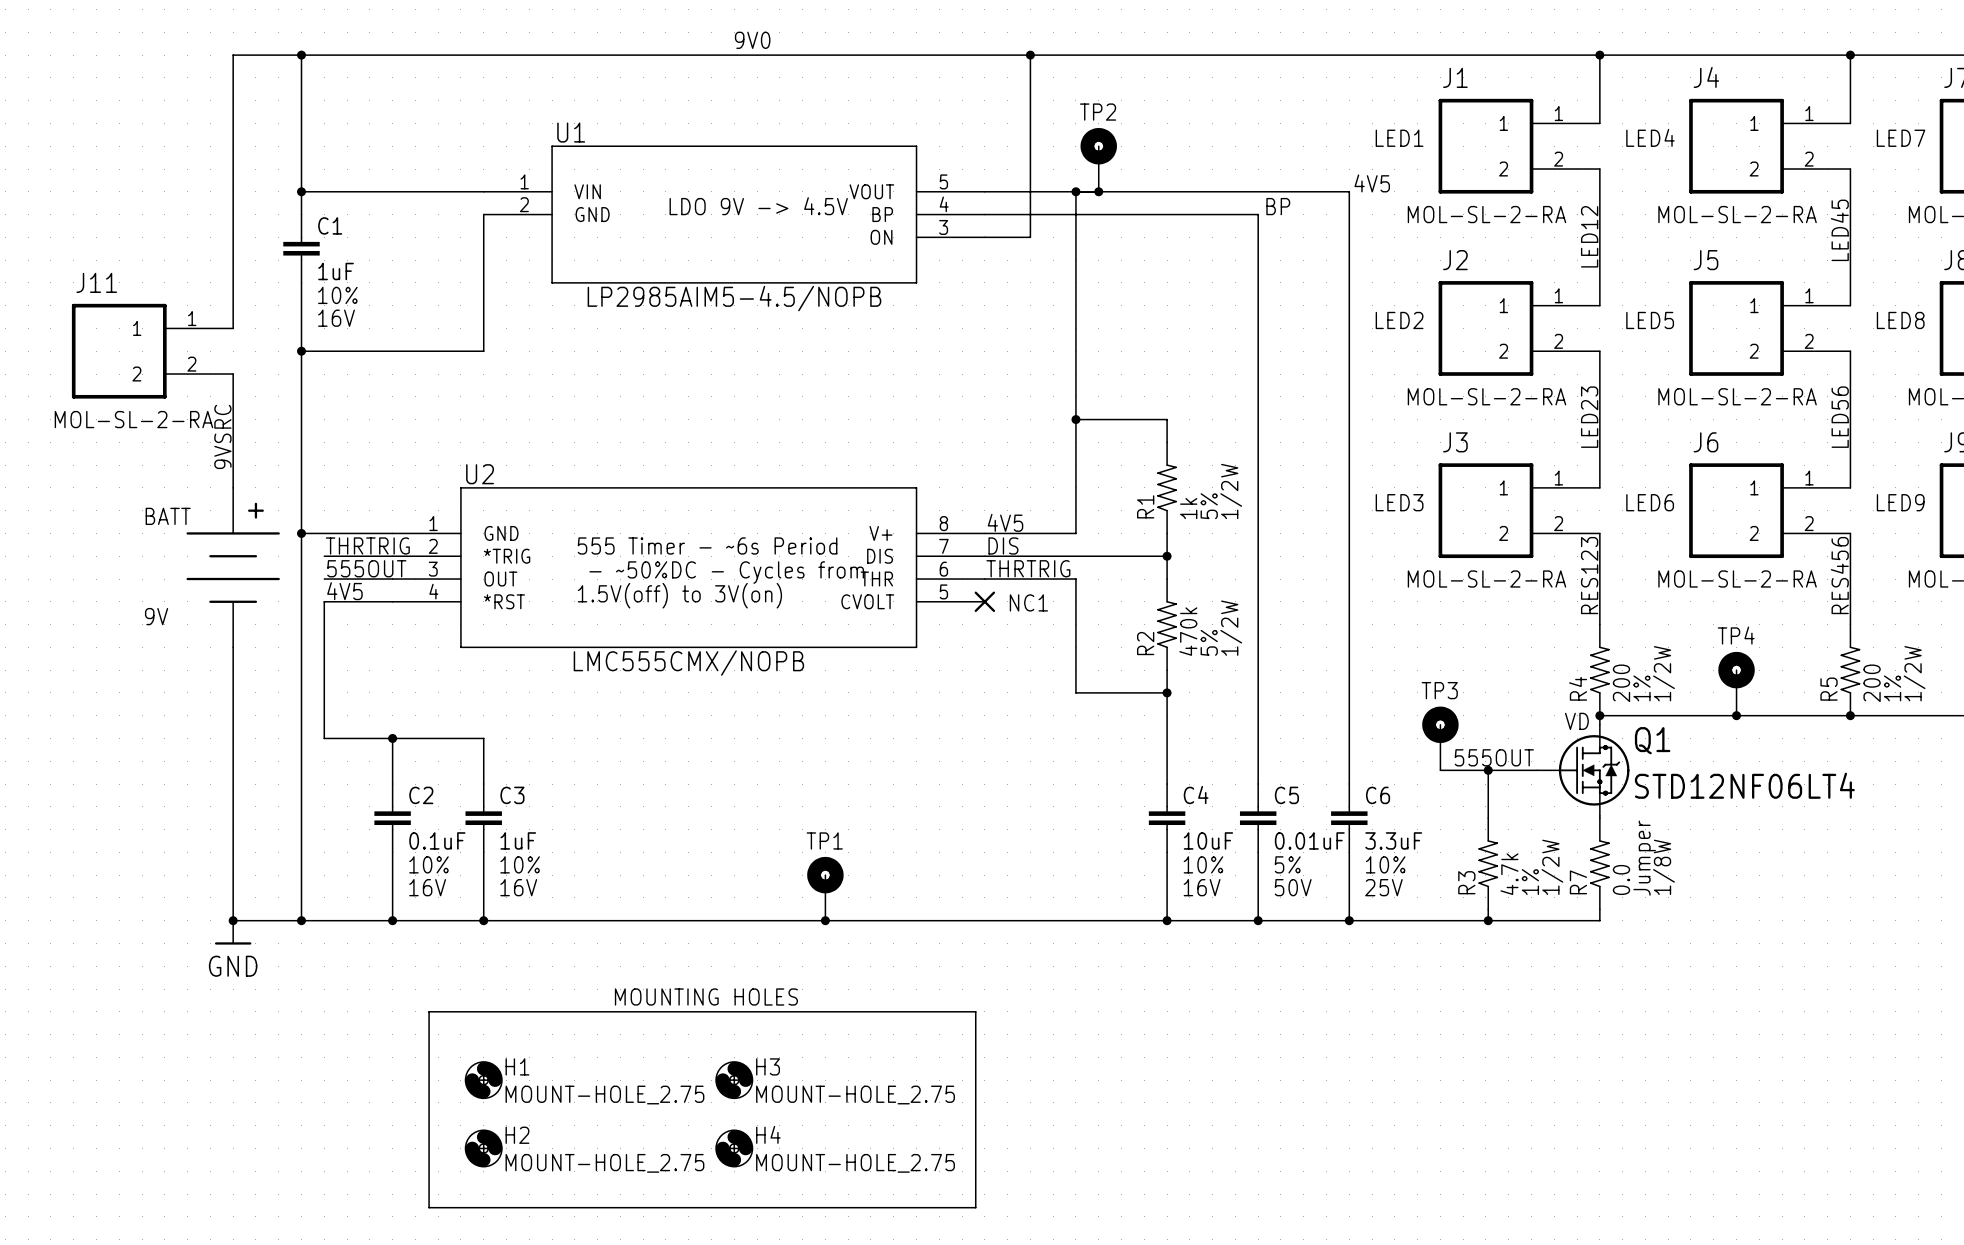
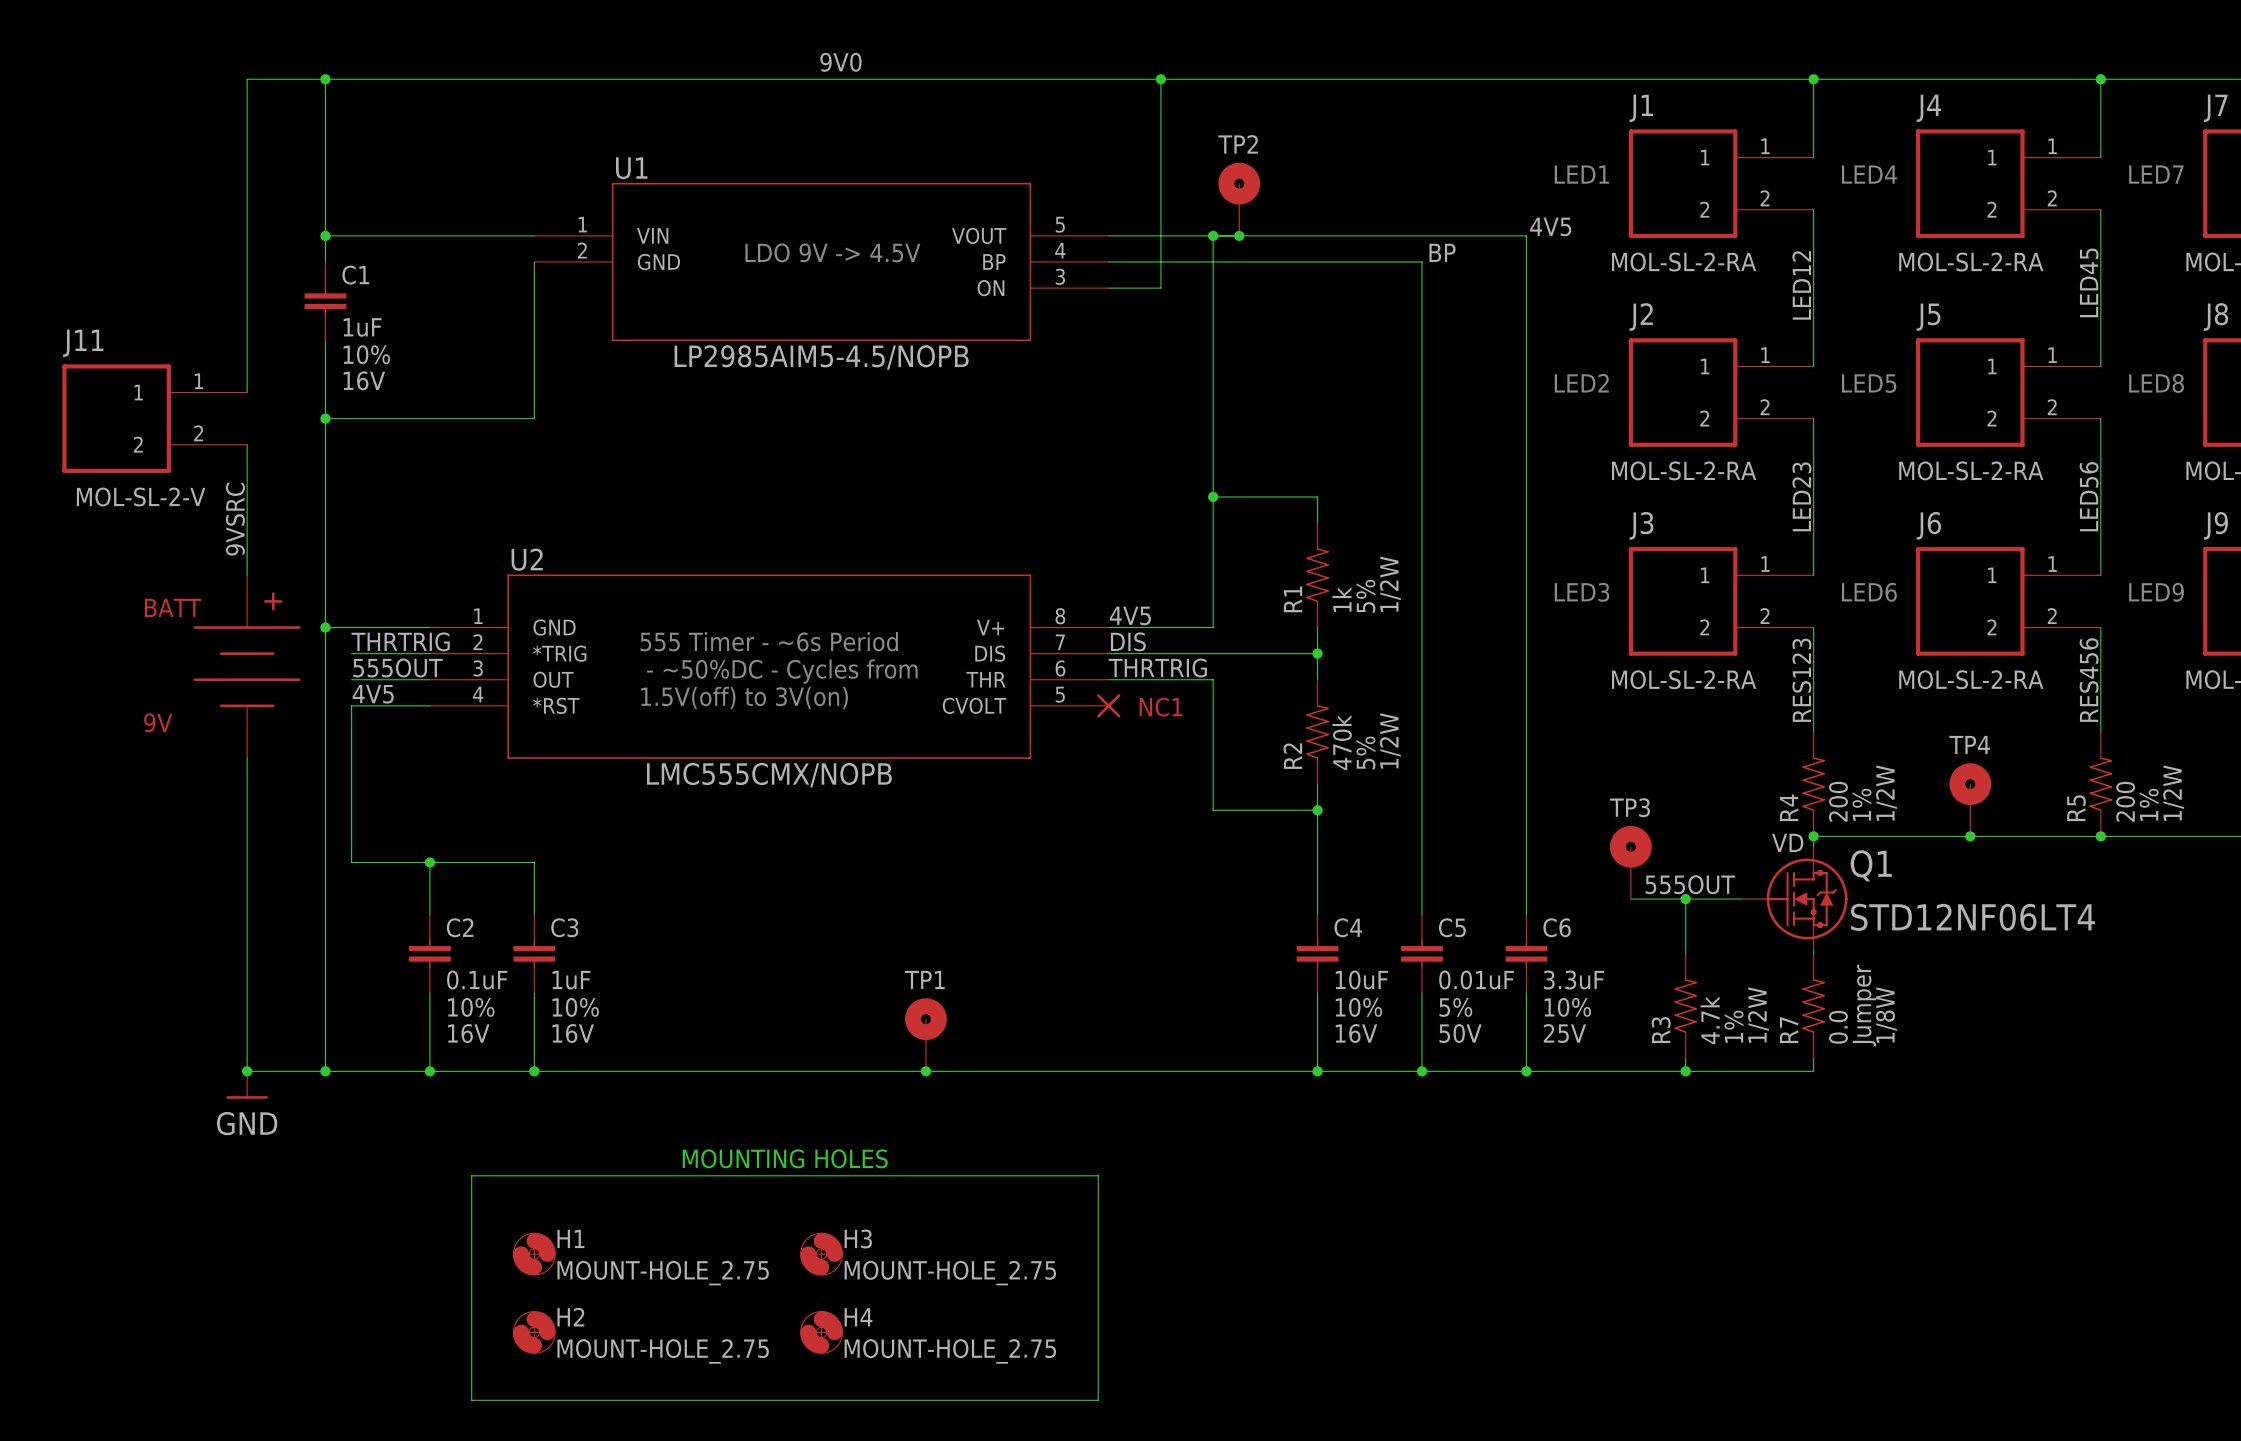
J11 value: MOL-SL-2-RA (133, 419) -> MOL-SL-2-V (141, 497)

